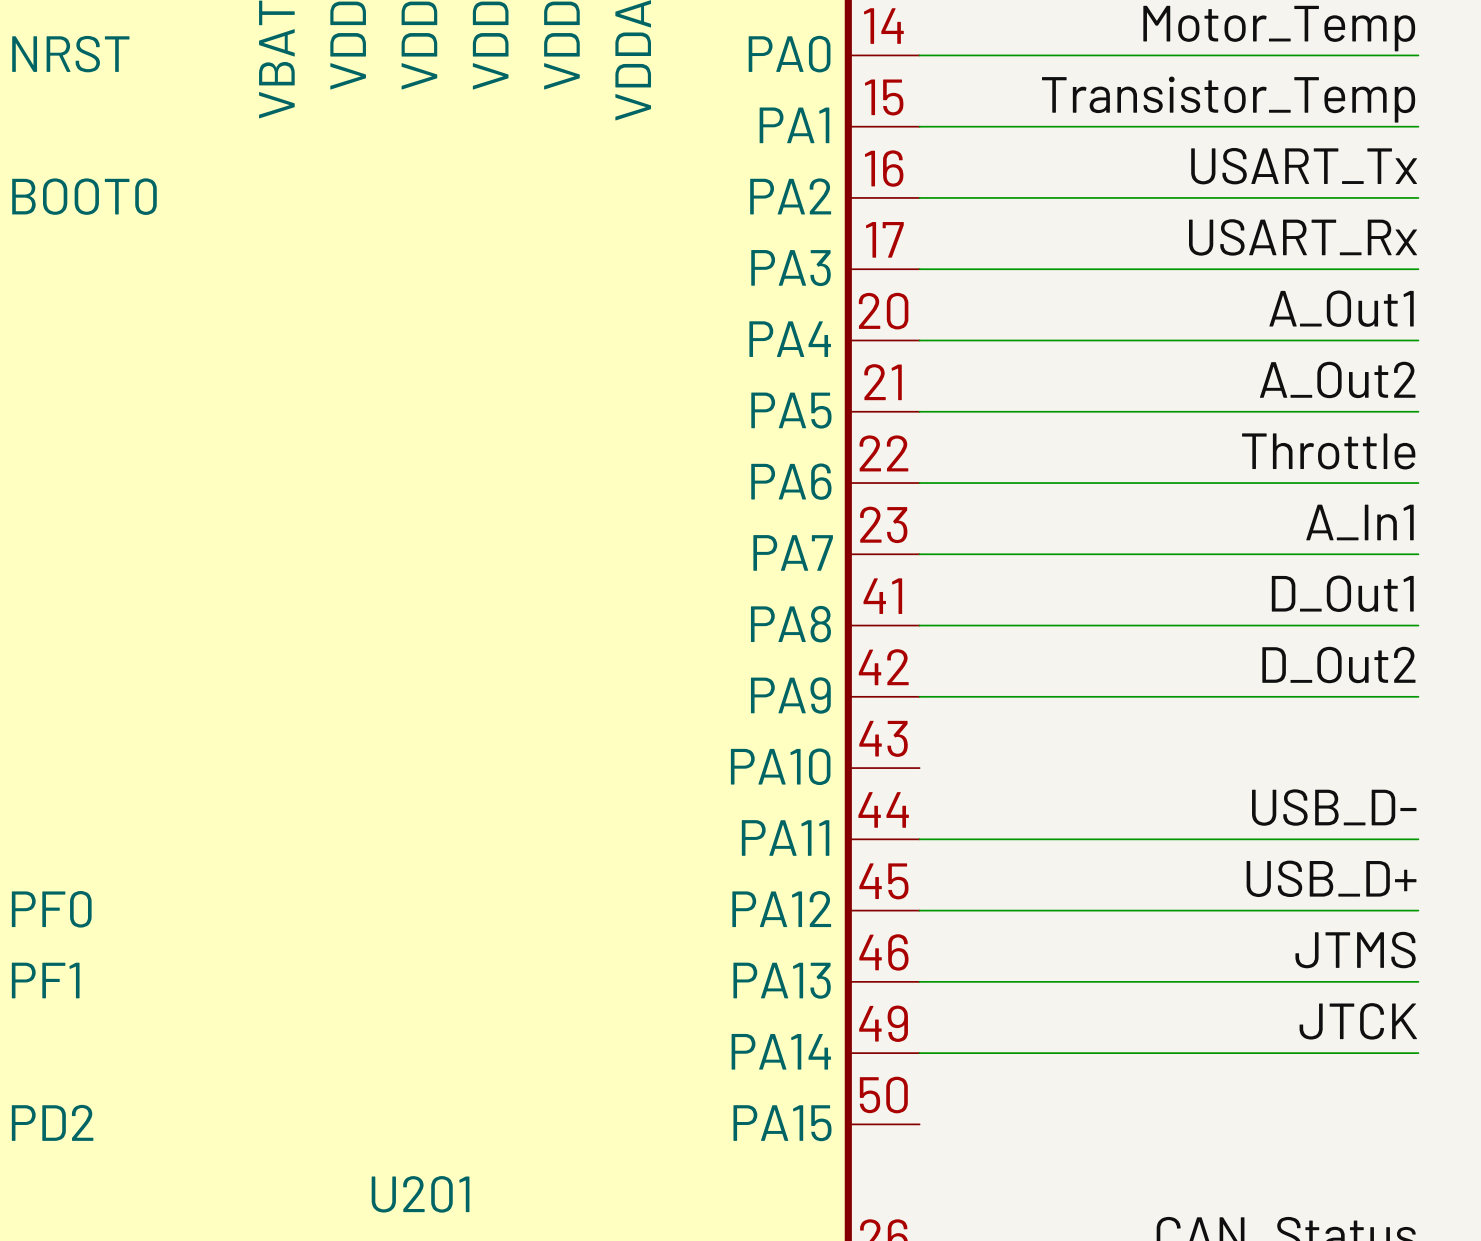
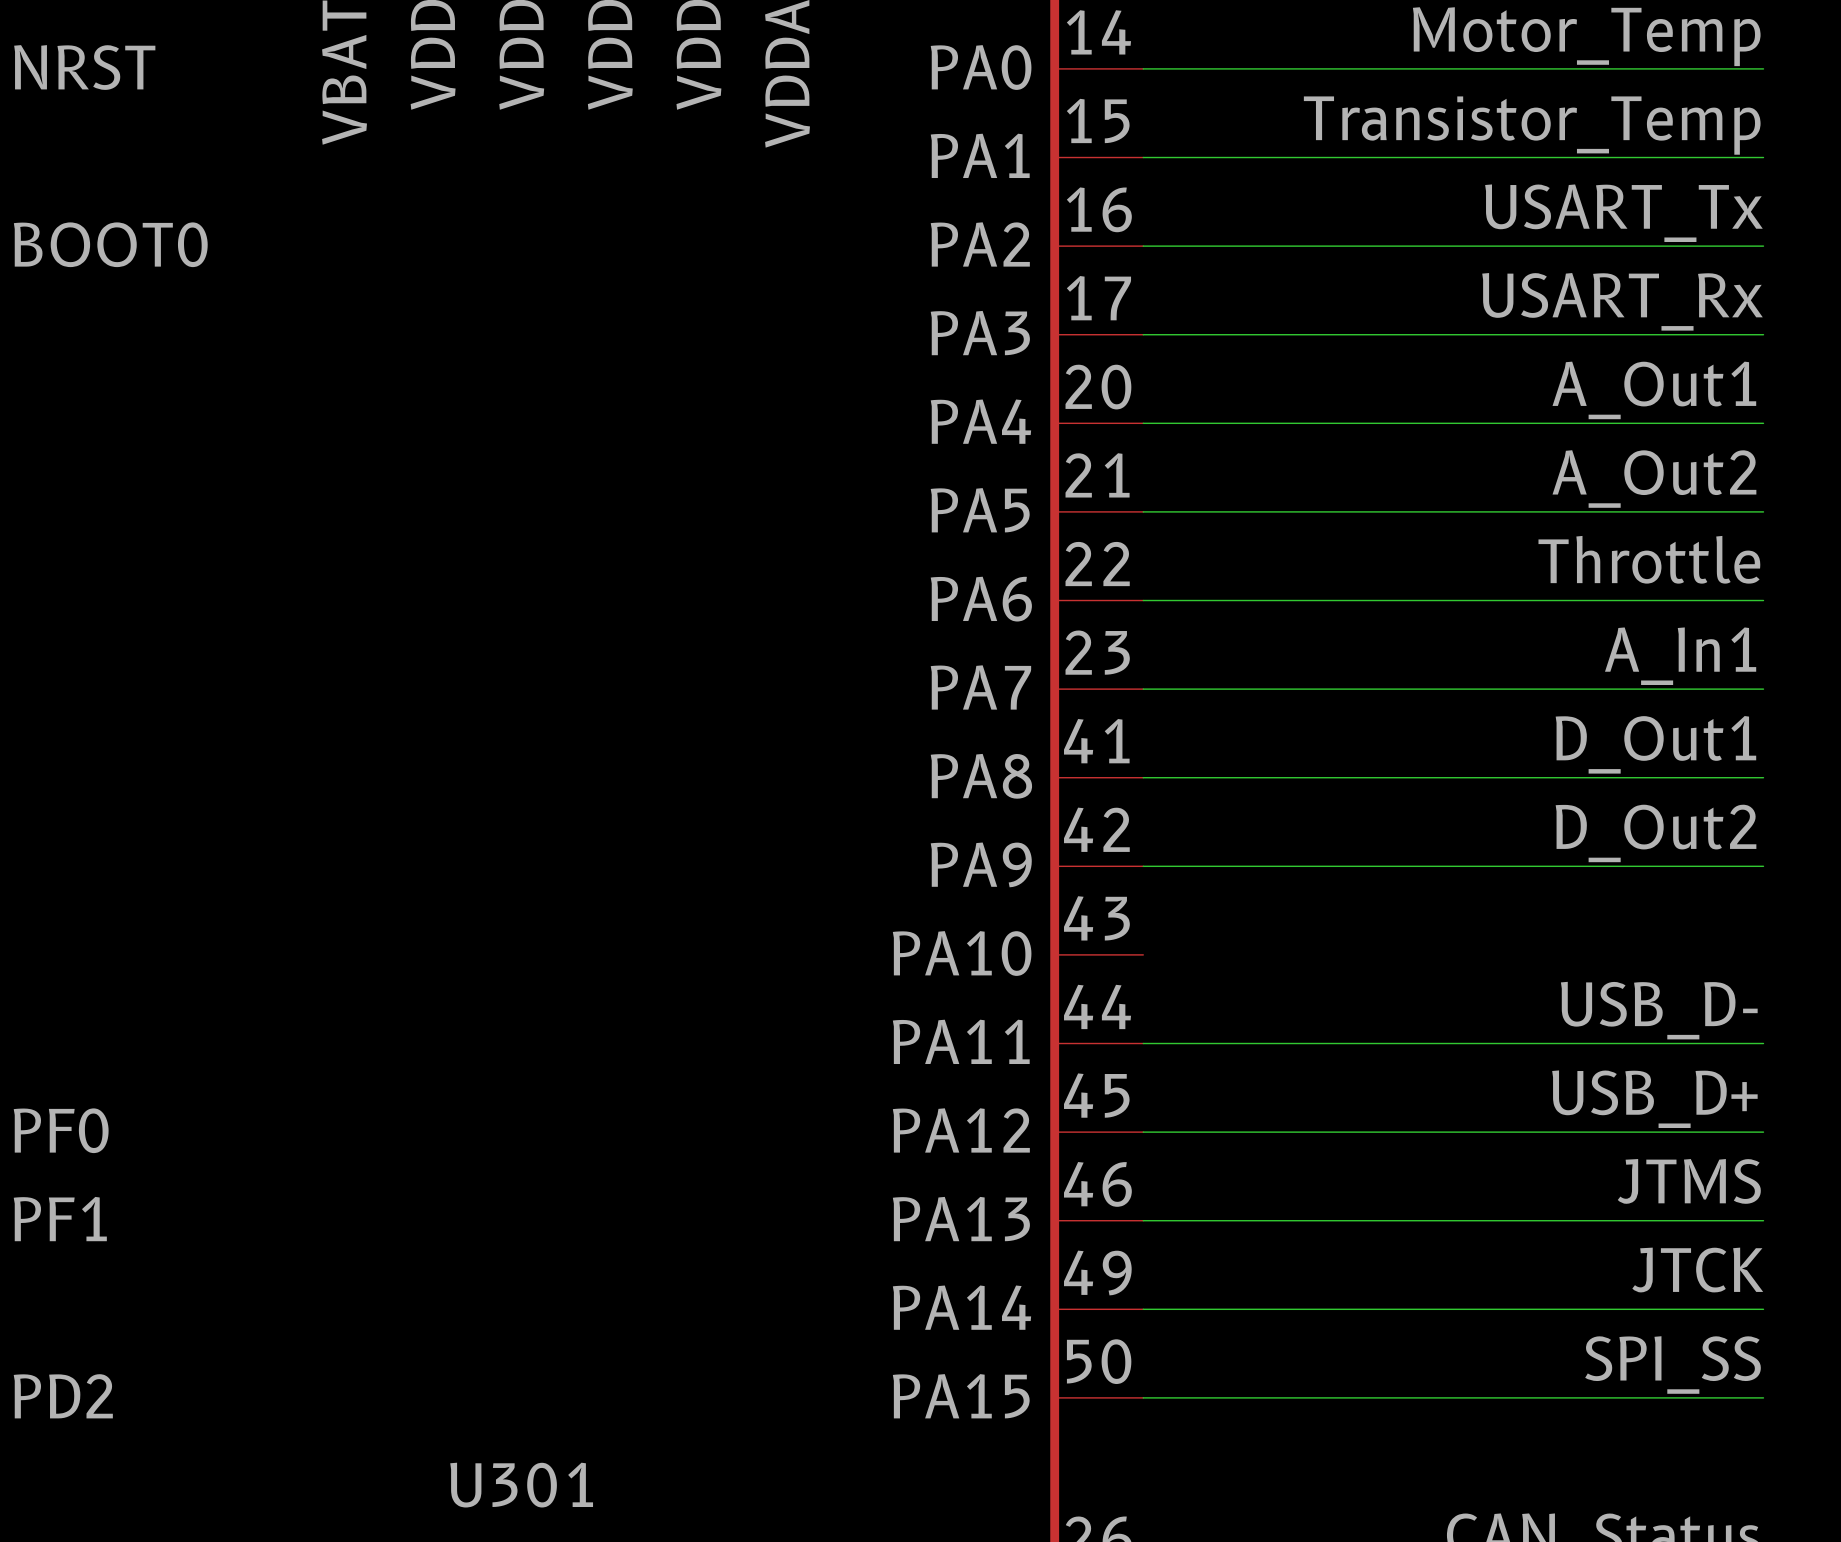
label: none -> SPI_SS (1673, 1365)
wire: none -> (1143, 1397) (1763, 1397)
U201 name: U201 (420, 1194) -> U301 (521, 1485)

